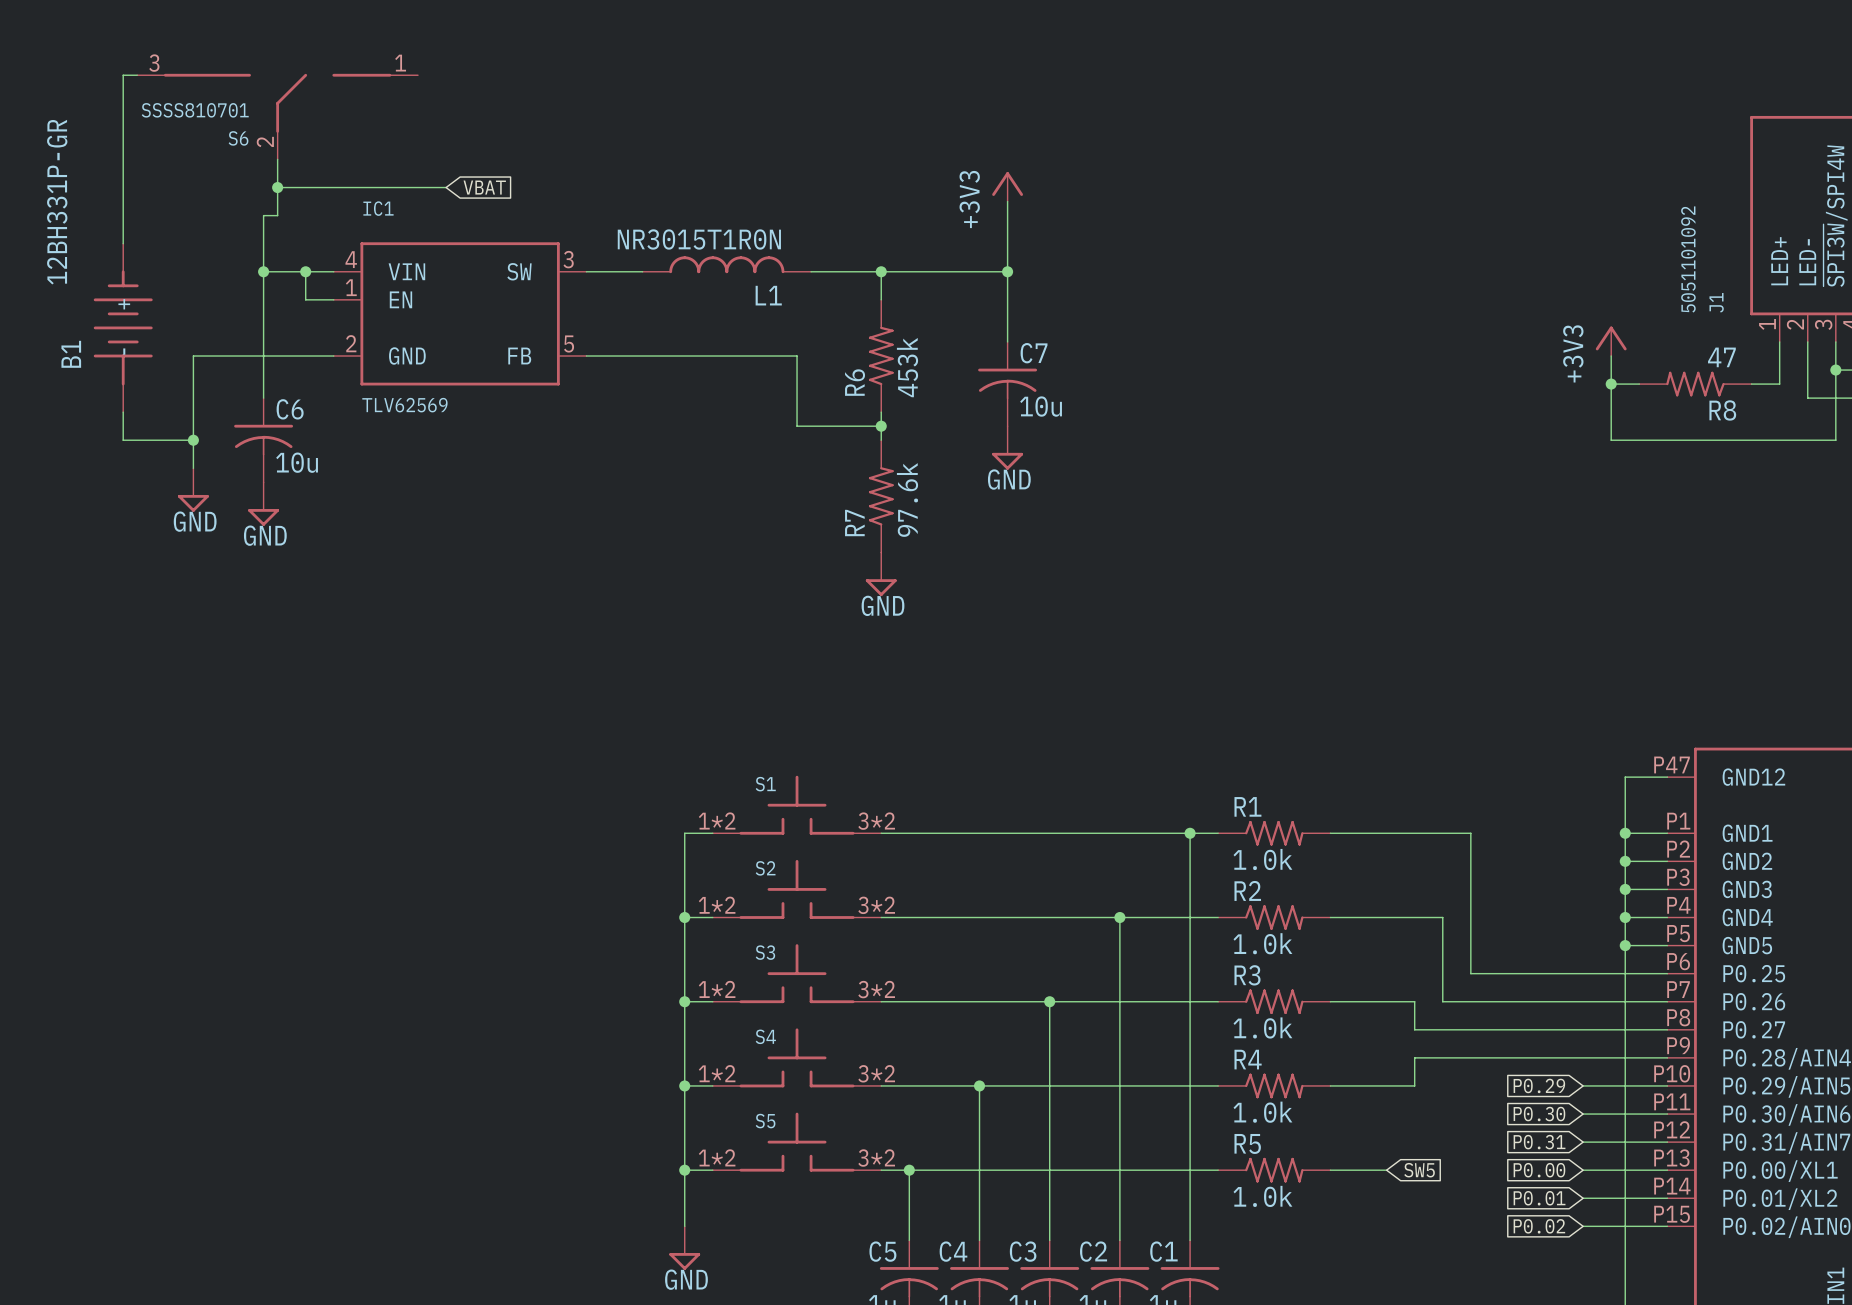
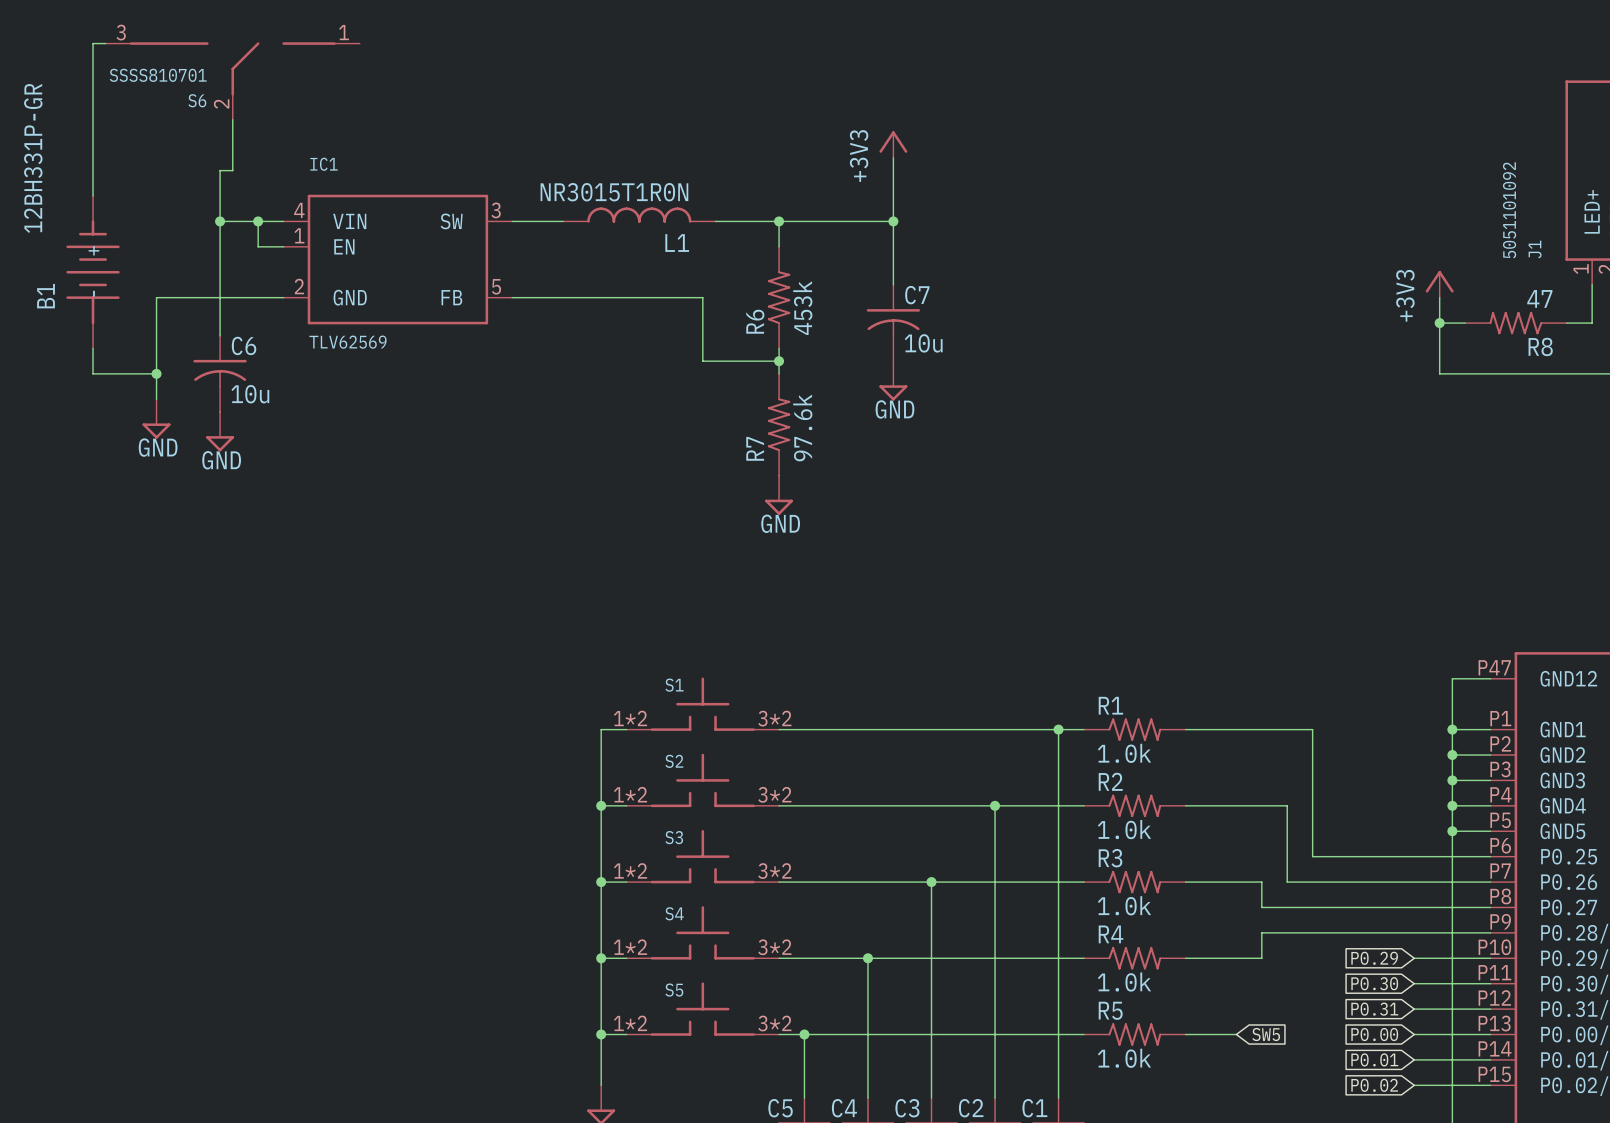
wire: (277, 187) (446, 187) -> none
junction: (277, 187) -> none
global label: VBAT (484, 187) -> none

